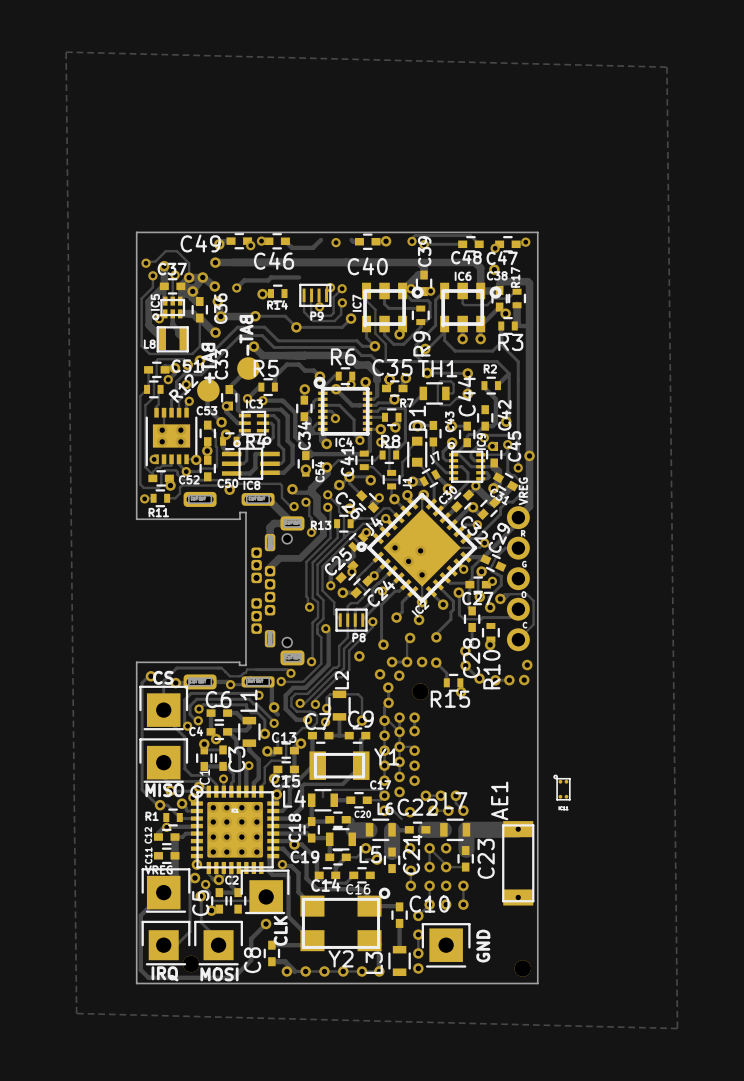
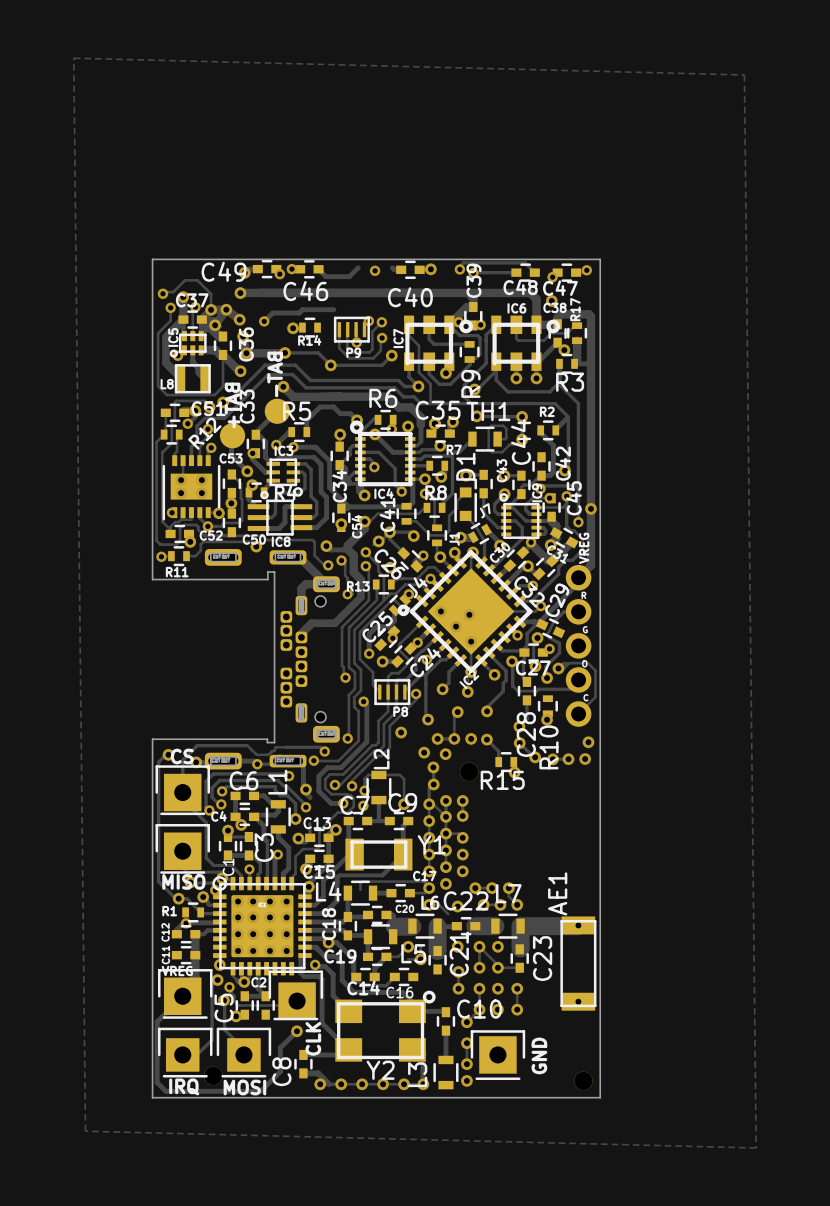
part: (561, 787) -> none

